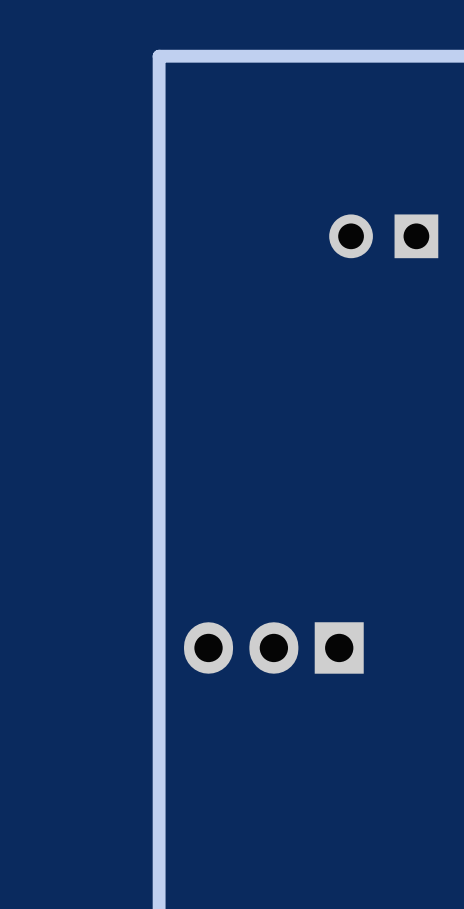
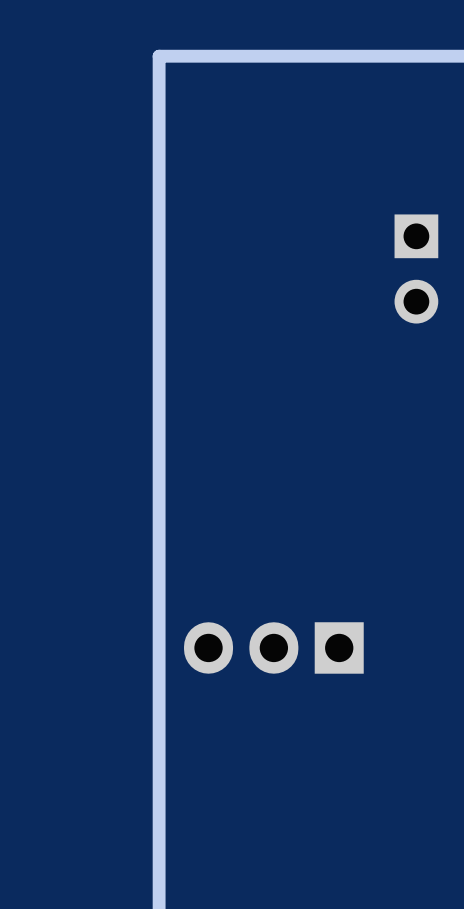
part rotation: 0° (383, 236) -> 90° counterclockwise (416, 268)

